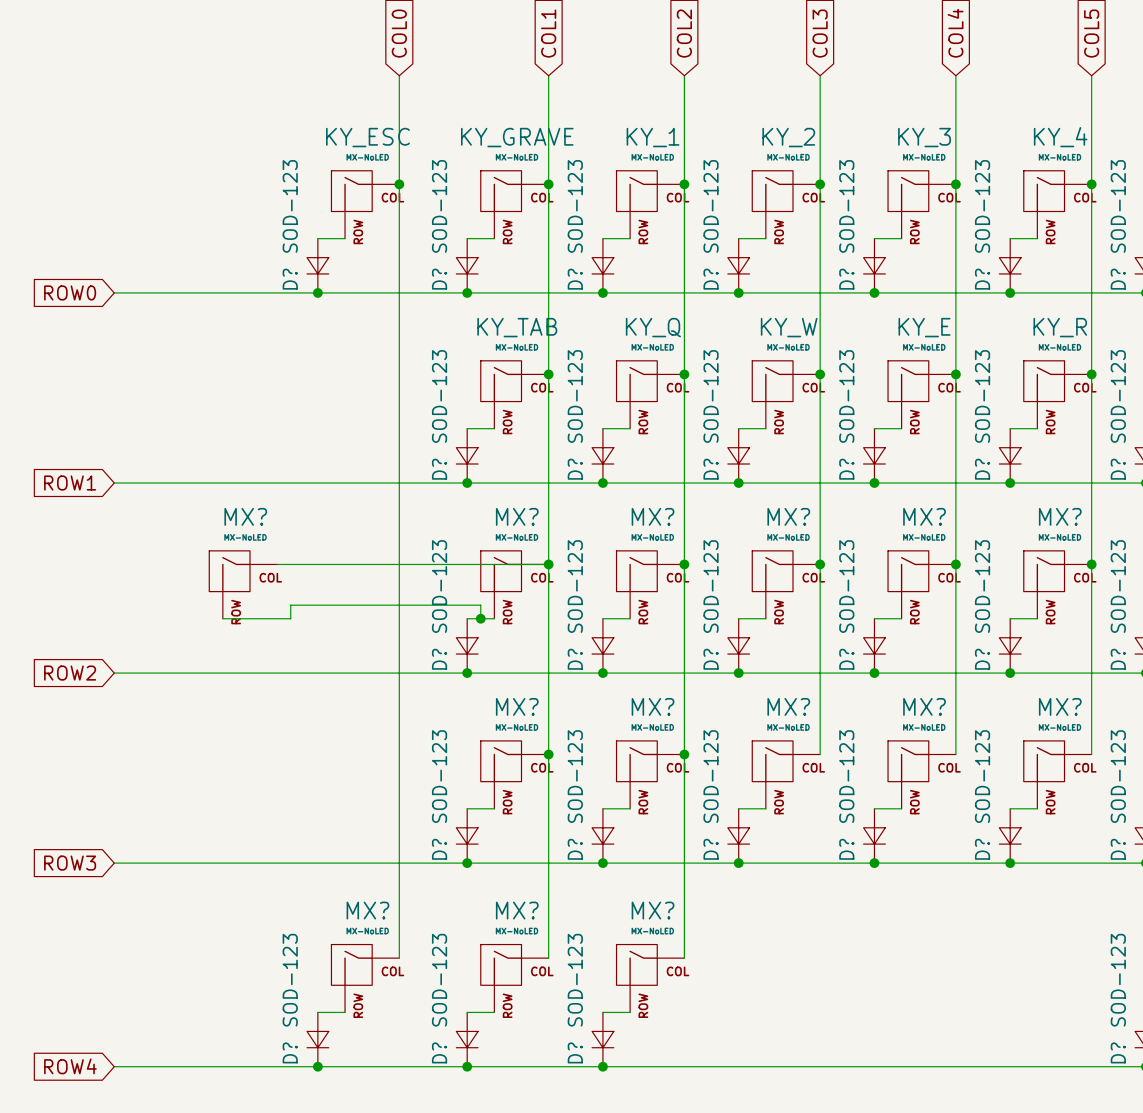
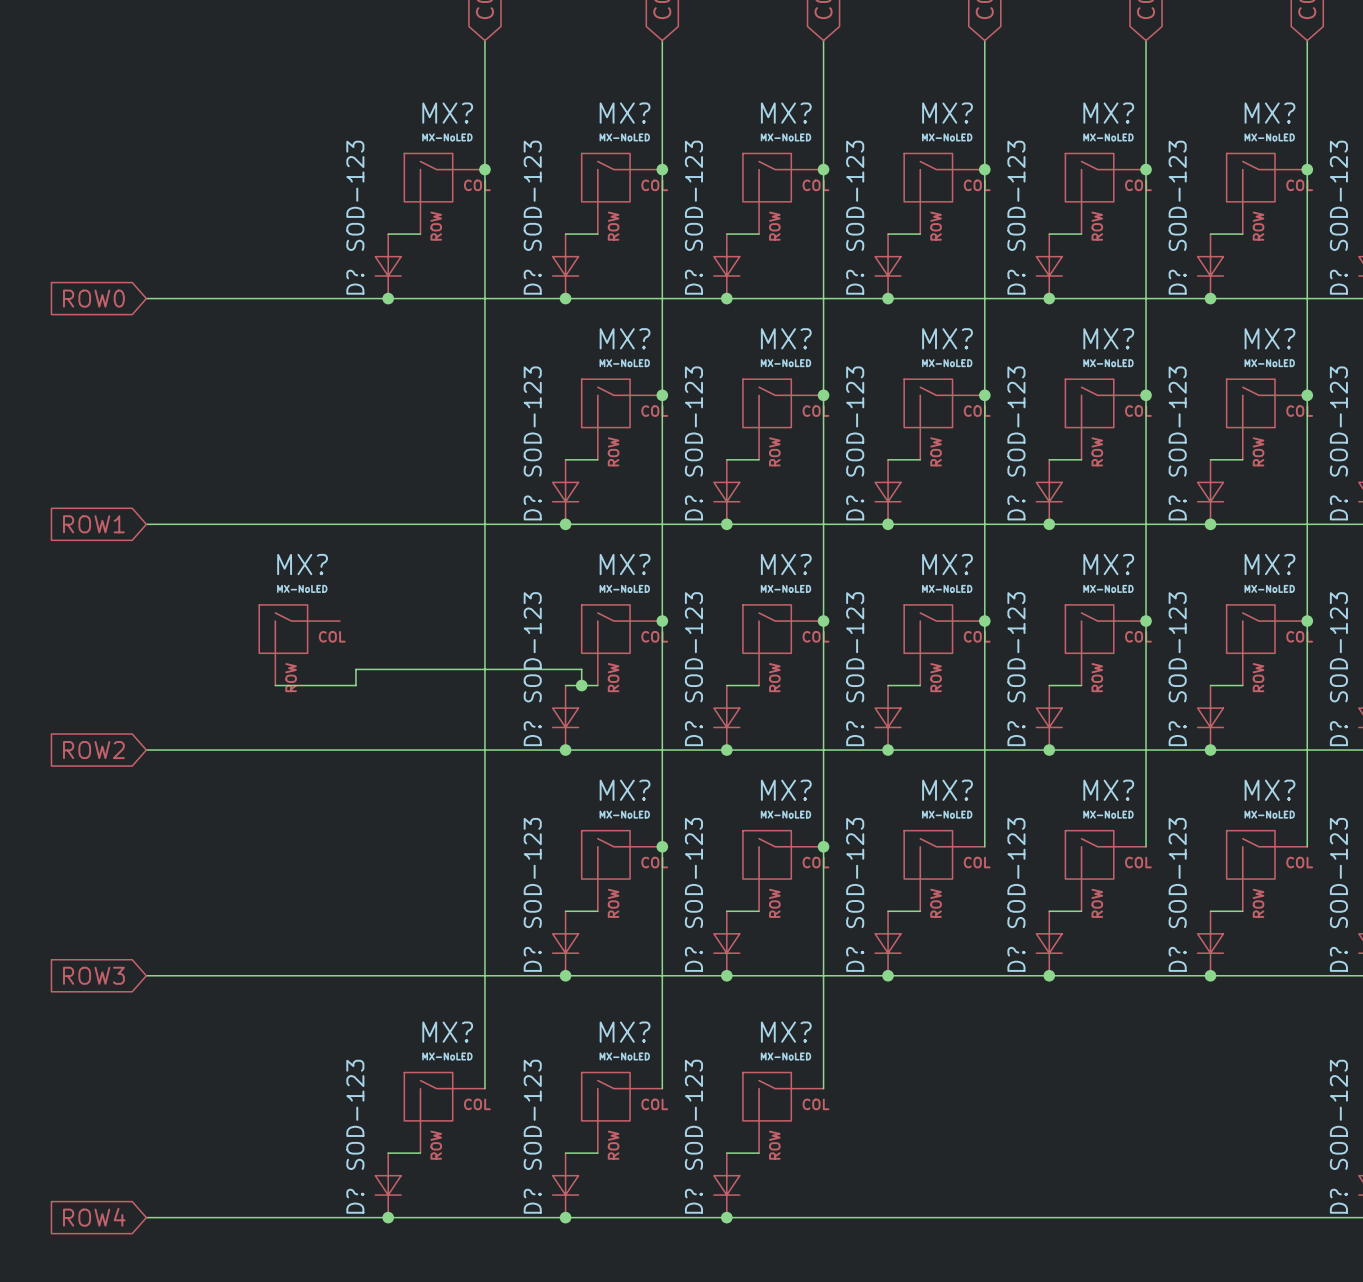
KY_ESC name: KY_ESC (367, 137) -> MX? (447, 113)
KY_GRAVE name: KY_GRAVE (517, 137) -> MX? (625, 113)
KY_1 name: KY_1 (653, 137) -> MX? (786, 113)
KY_2 name: KY_2 (788, 137) -> MX? (947, 113)
KY_3 name: KY_3 (924, 137) -> MX? (1108, 113)
KY_4 name: KY_4 (1060, 137) -> MX? (1269, 113)
KY_TAB name: KY_TAB (517, 327) -> MX? (625, 338)
KY_Q name: KY_Q (653, 327) -> MX? (786, 338)
KY_W name: KY_W (789, 327) -> MX? (947, 338)
KY_E name: KY_E (924, 327) -> MX? (1108, 338)
KY_R name: KY_R (1060, 327) -> MX? (1269, 338)
wire: (277, 564) (548, 564) -> none

